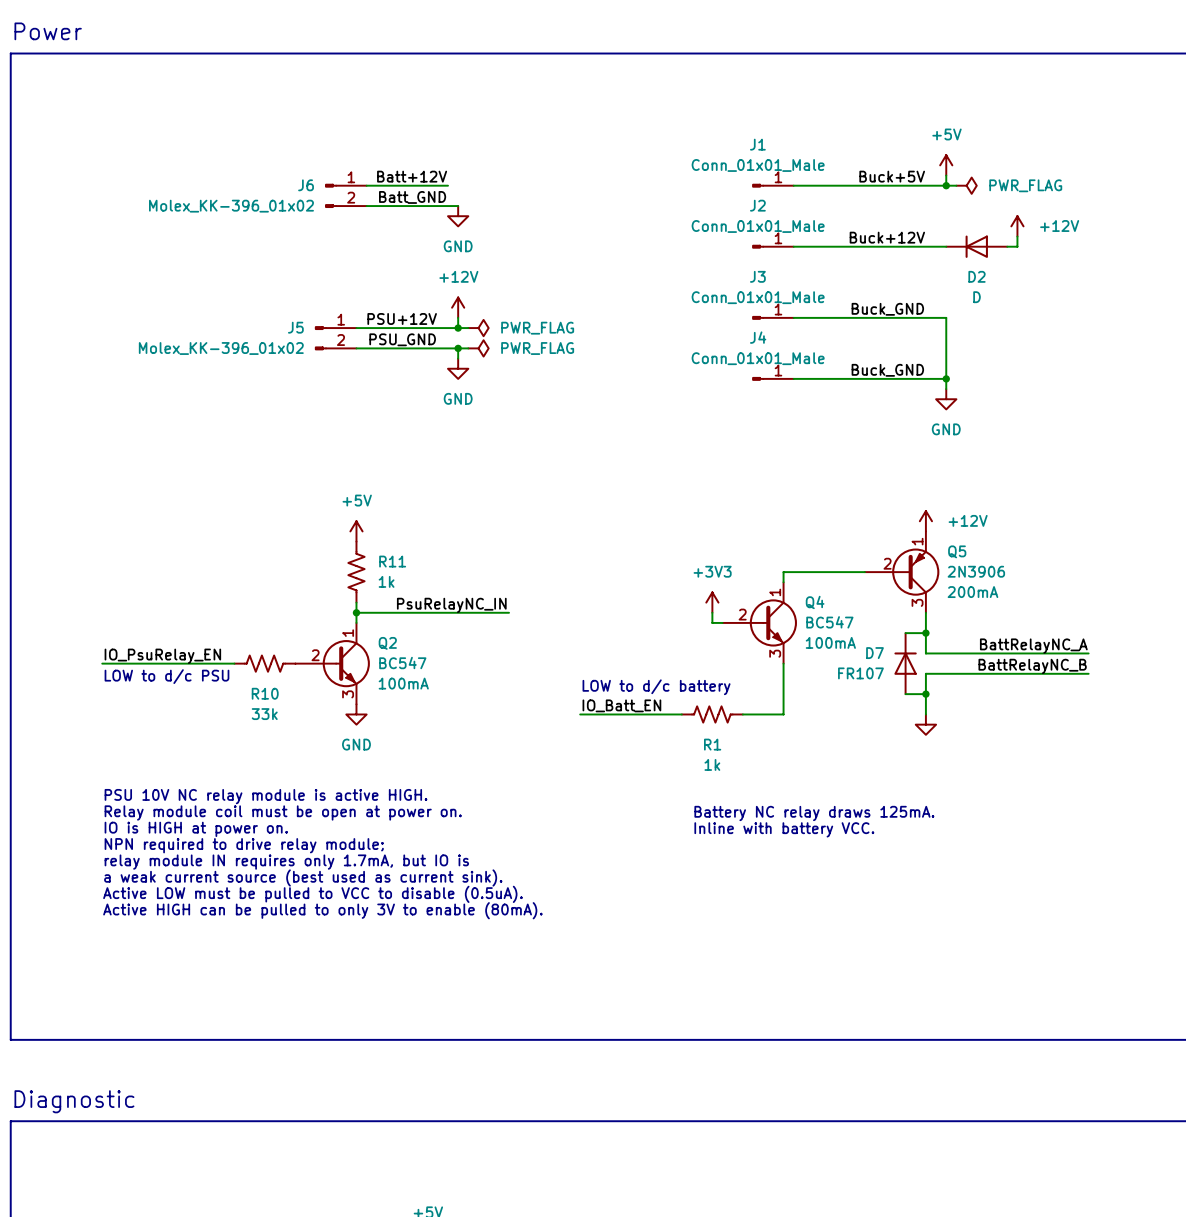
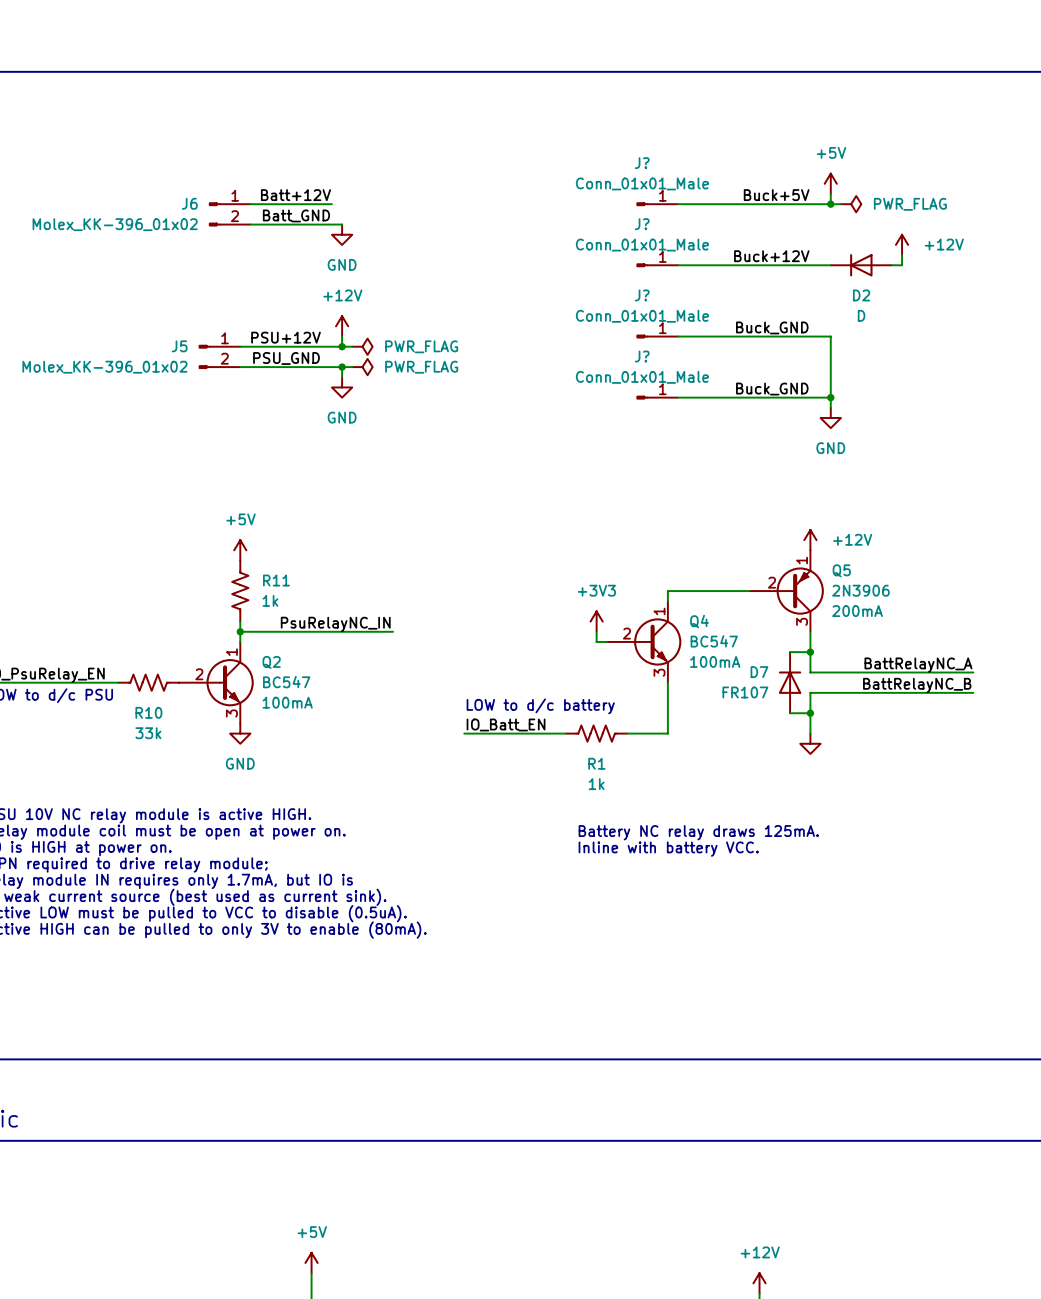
J1 name: J1 (757, 144) -> J? (642, 163)
J2 name: J2 (757, 205) -> J? (642, 224)
J3 name: J3 (757, 276) -> J? (642, 295)
J4 name: J4 (758, 337) -> J? (642, 356)

